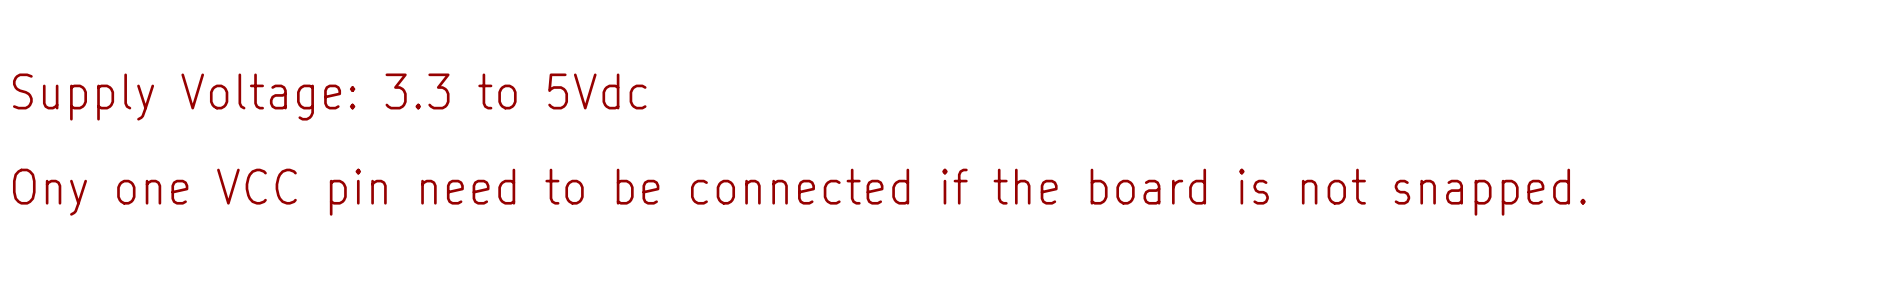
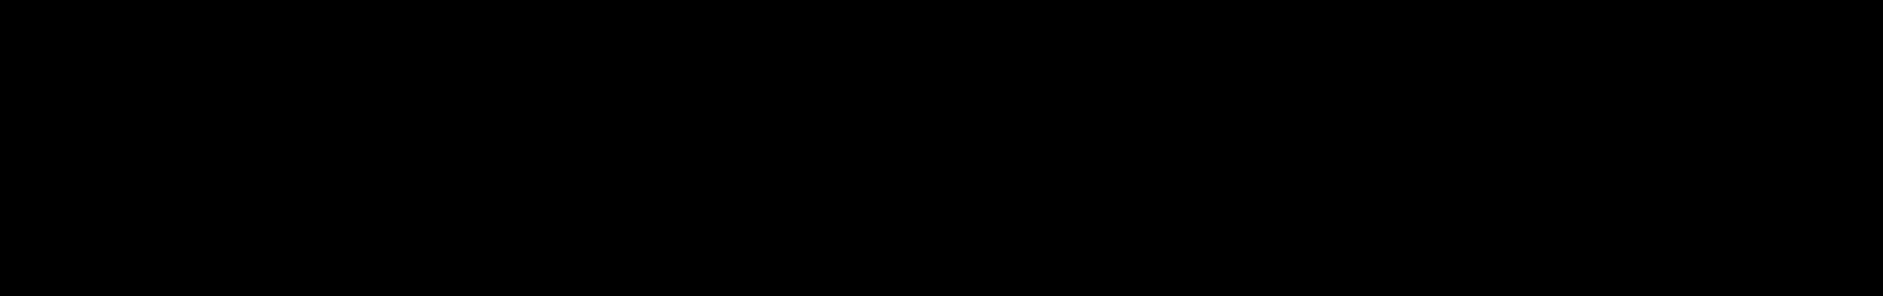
text: Supply Voltage: 3.3 to 5Vdc (329, 97) -> none
text: Ony one VCC pin need to be connected if the board is not snapped. (799, 192) -> none

